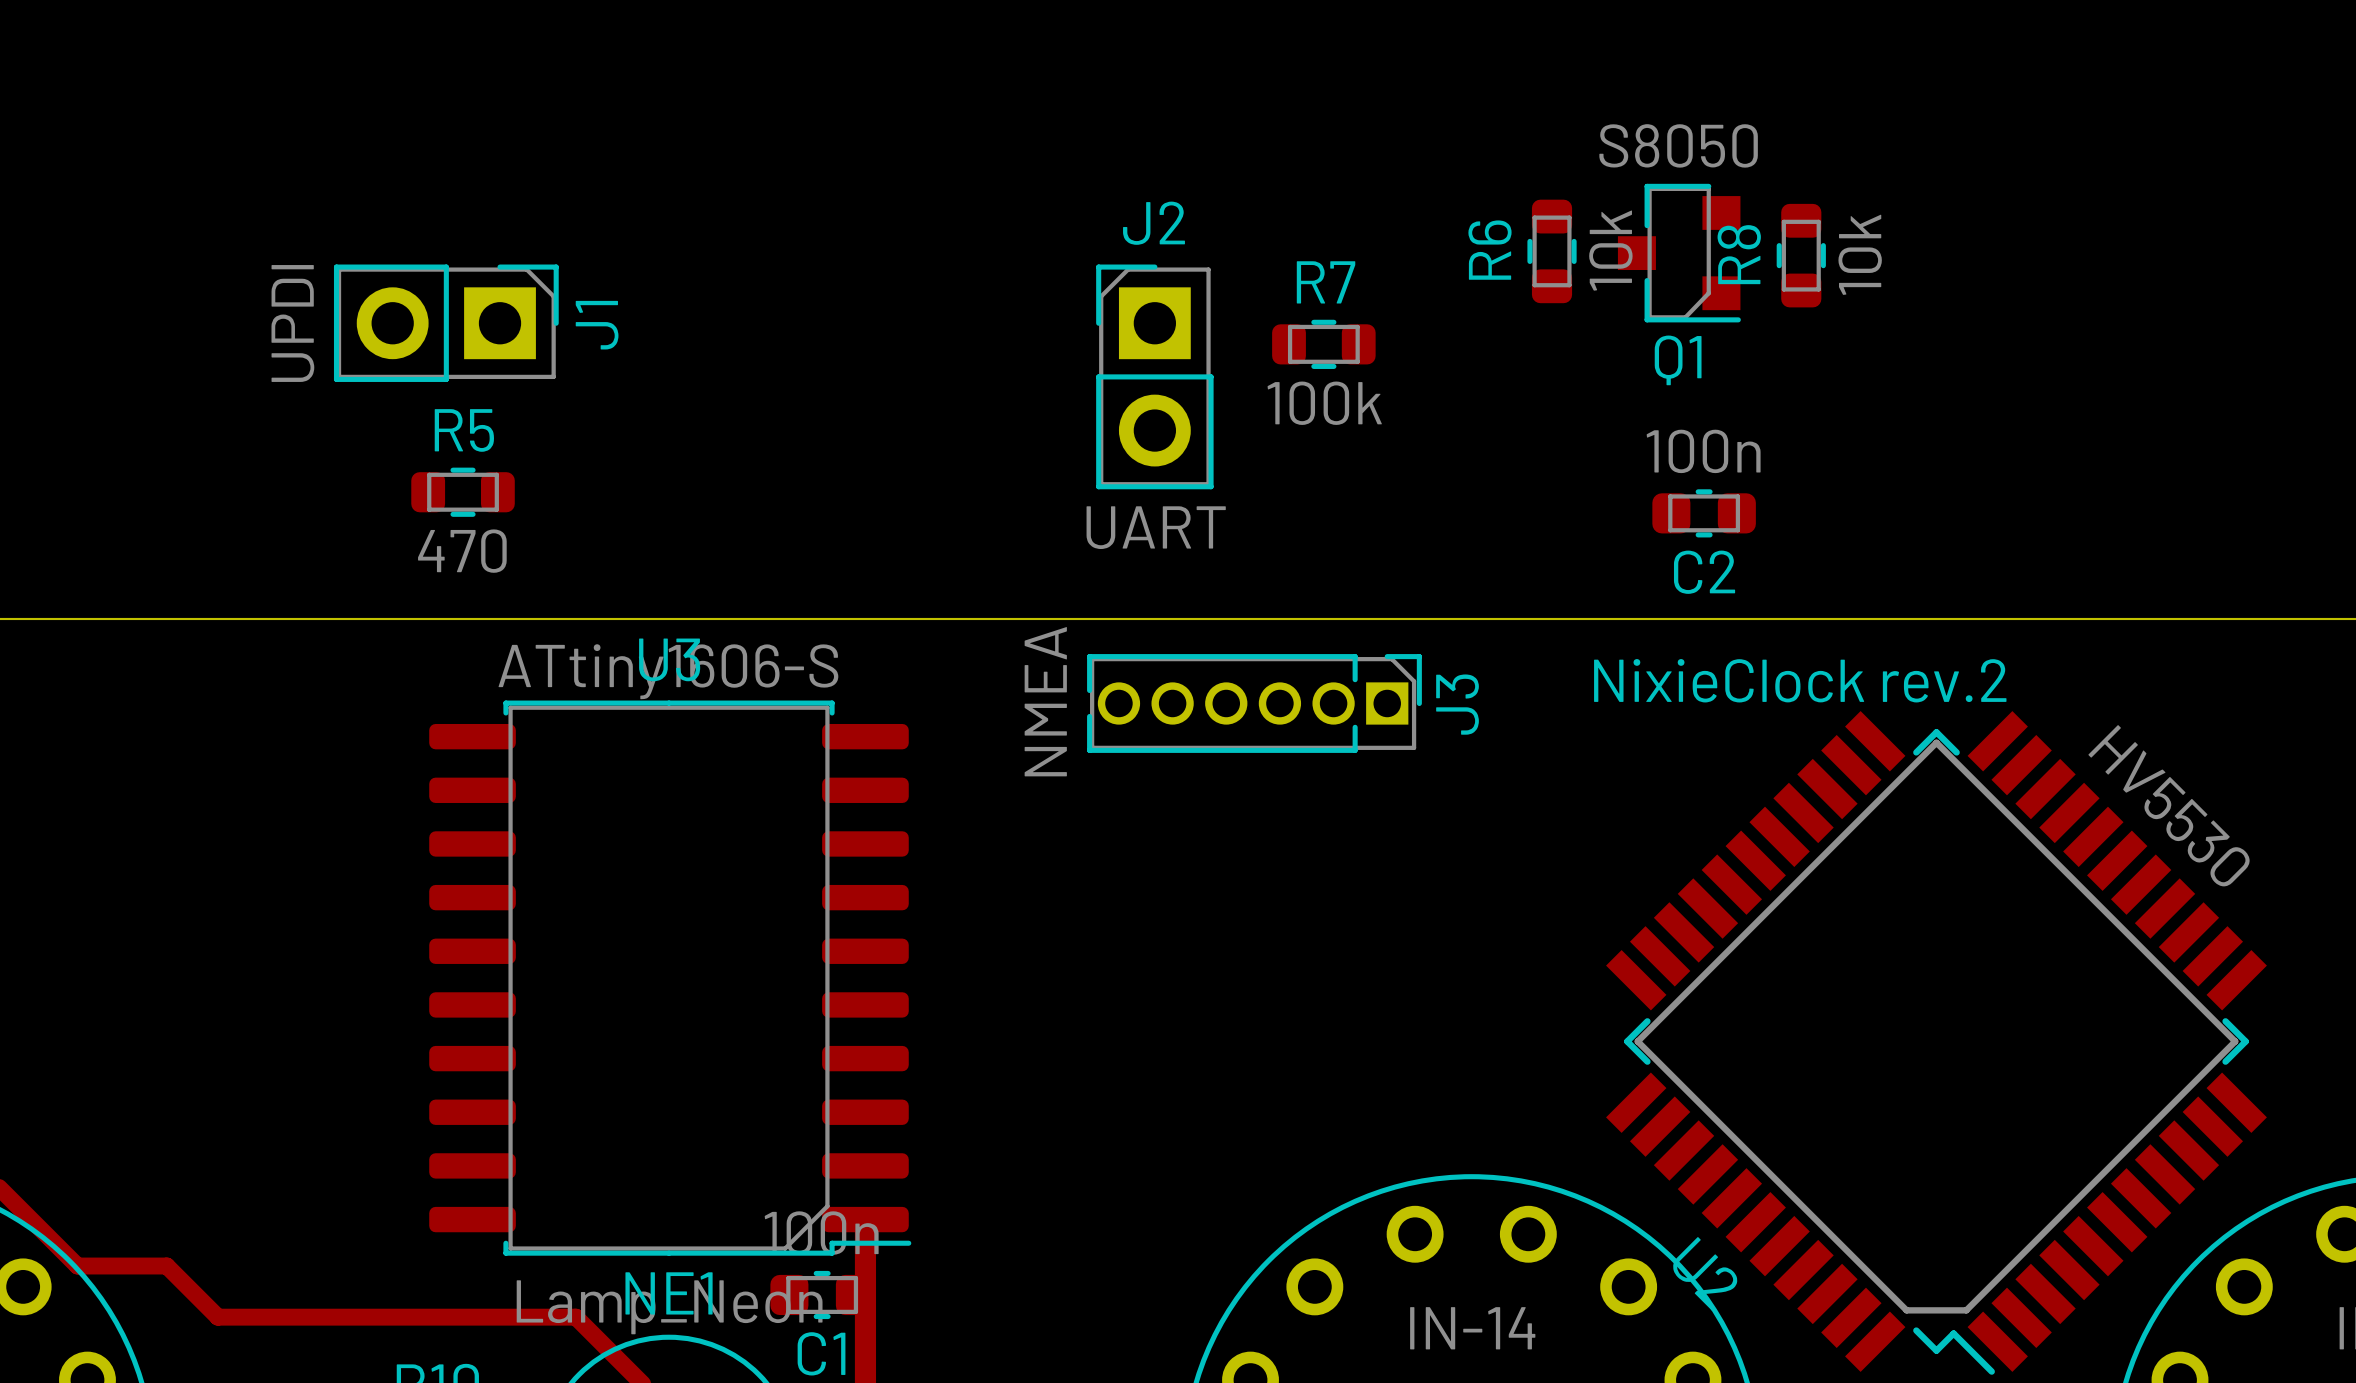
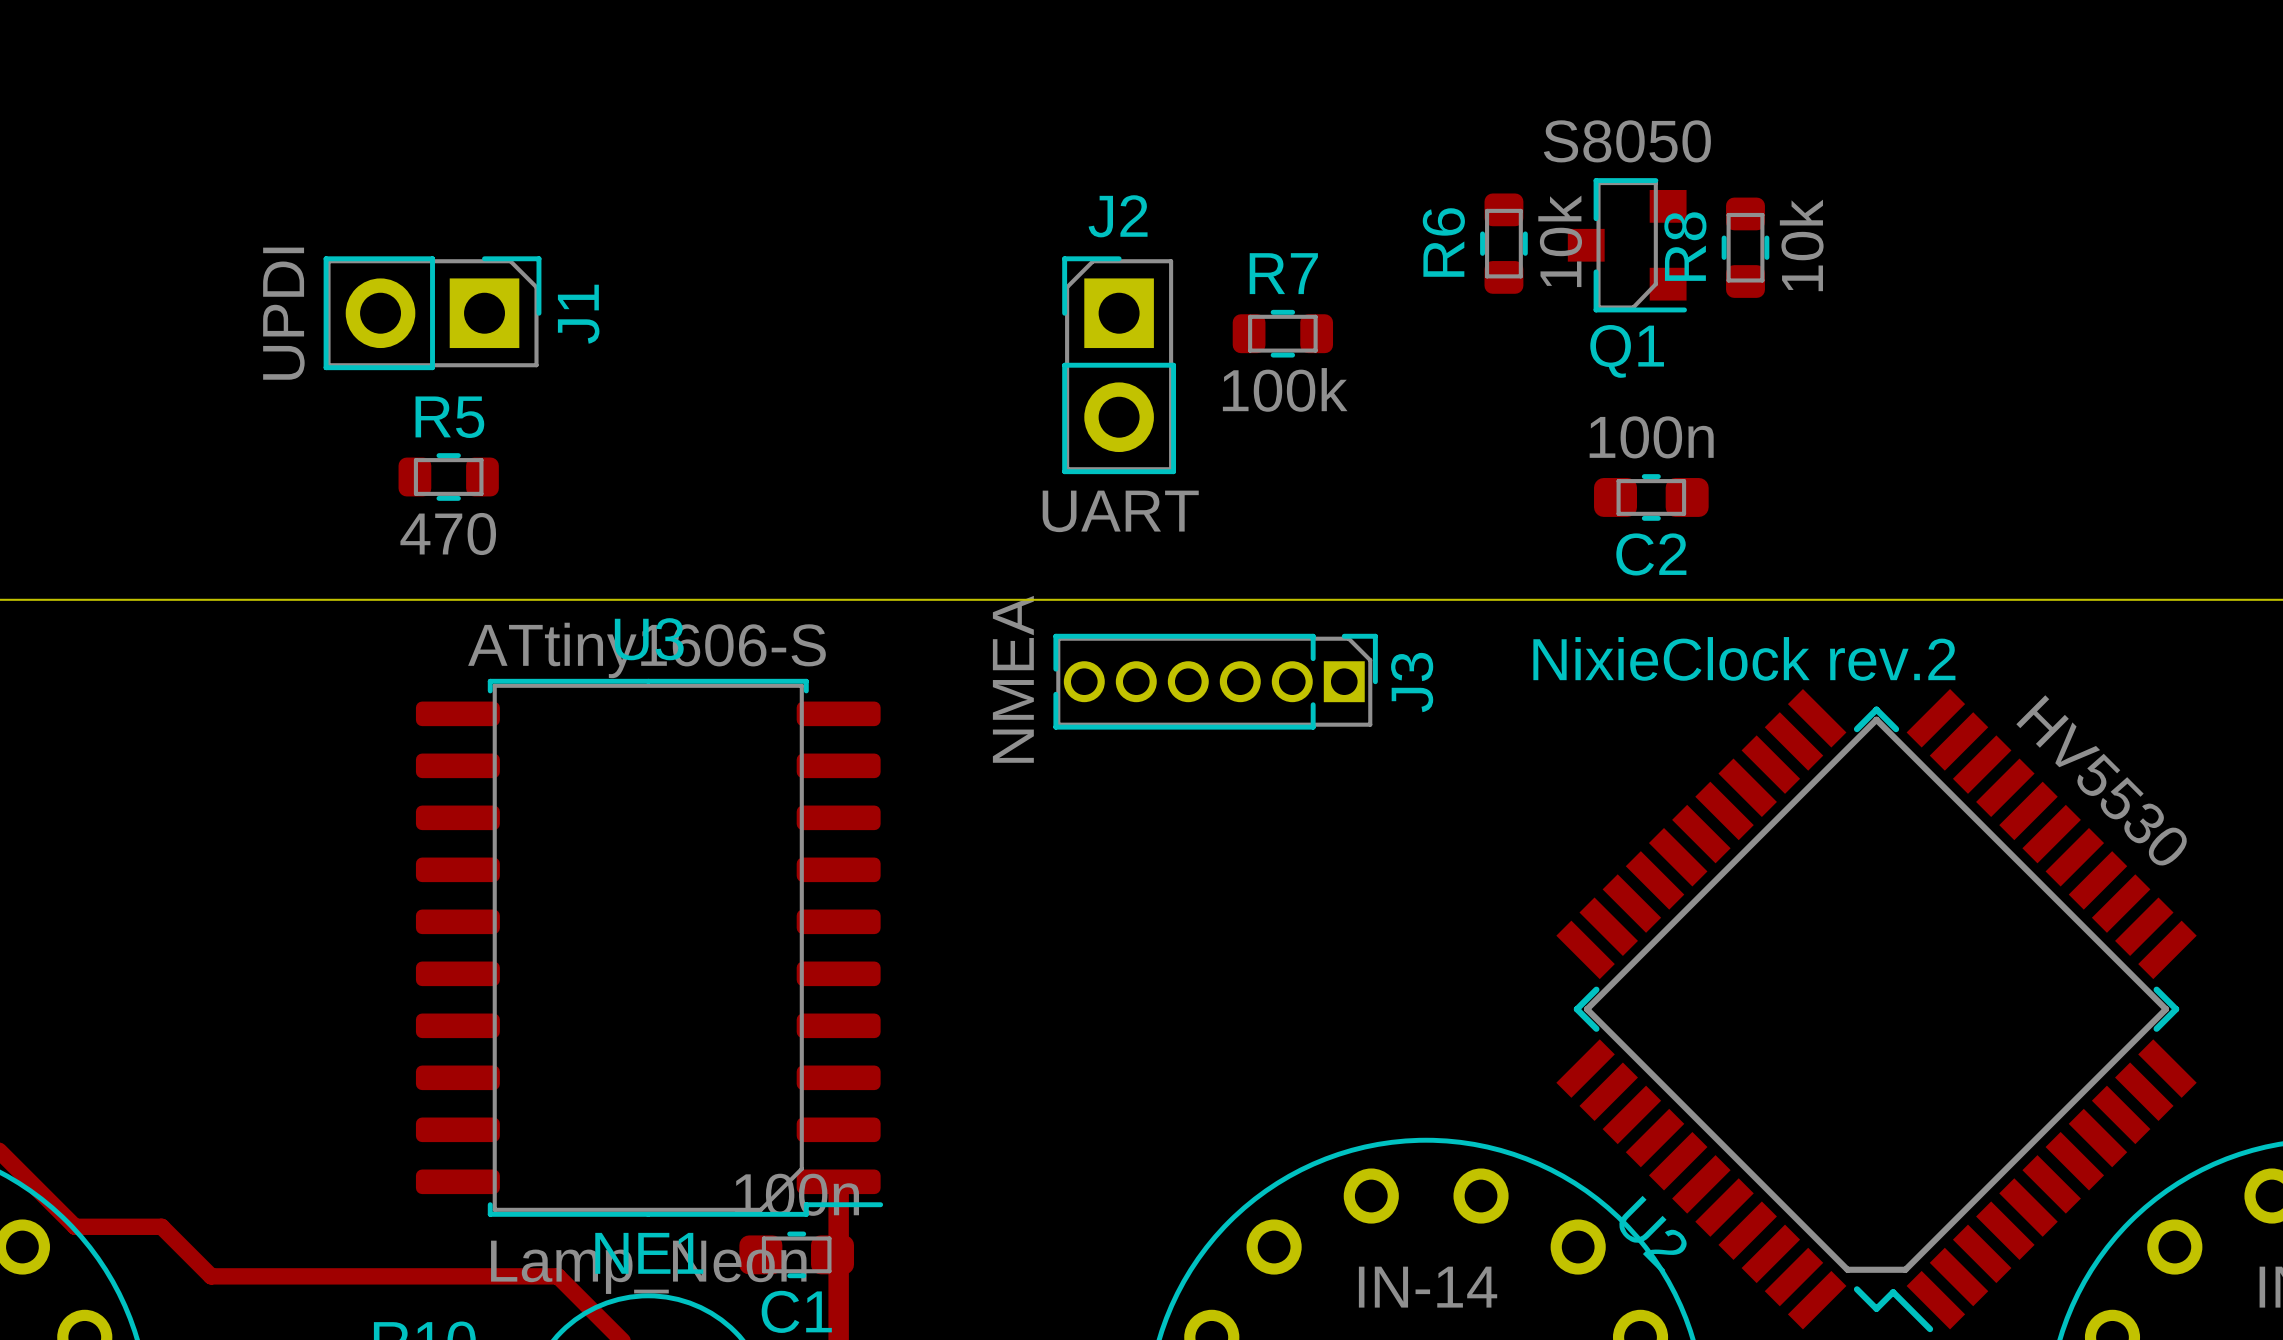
C2 footprint: [1652, 489, 1756, 538] -> [1594, 474, 1709, 521]
C1 footprint: [770, 1270, 874, 1320] -> [739, 1231, 855, 1279]

